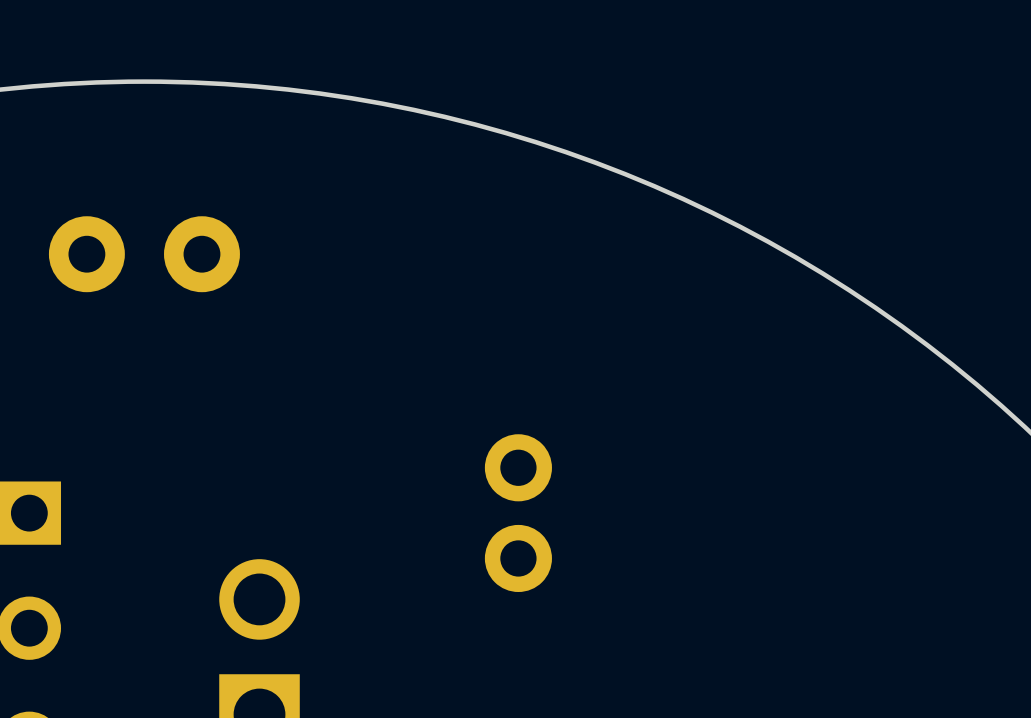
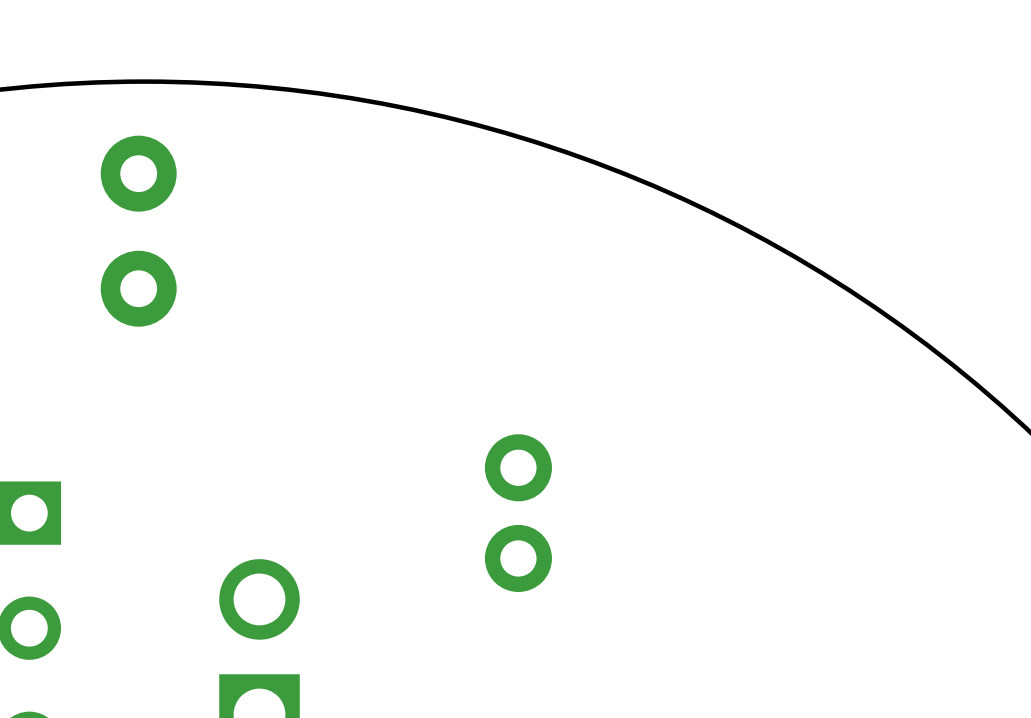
part rotation: 0° (144, 254) -> 90° clockwise (138, 231)

